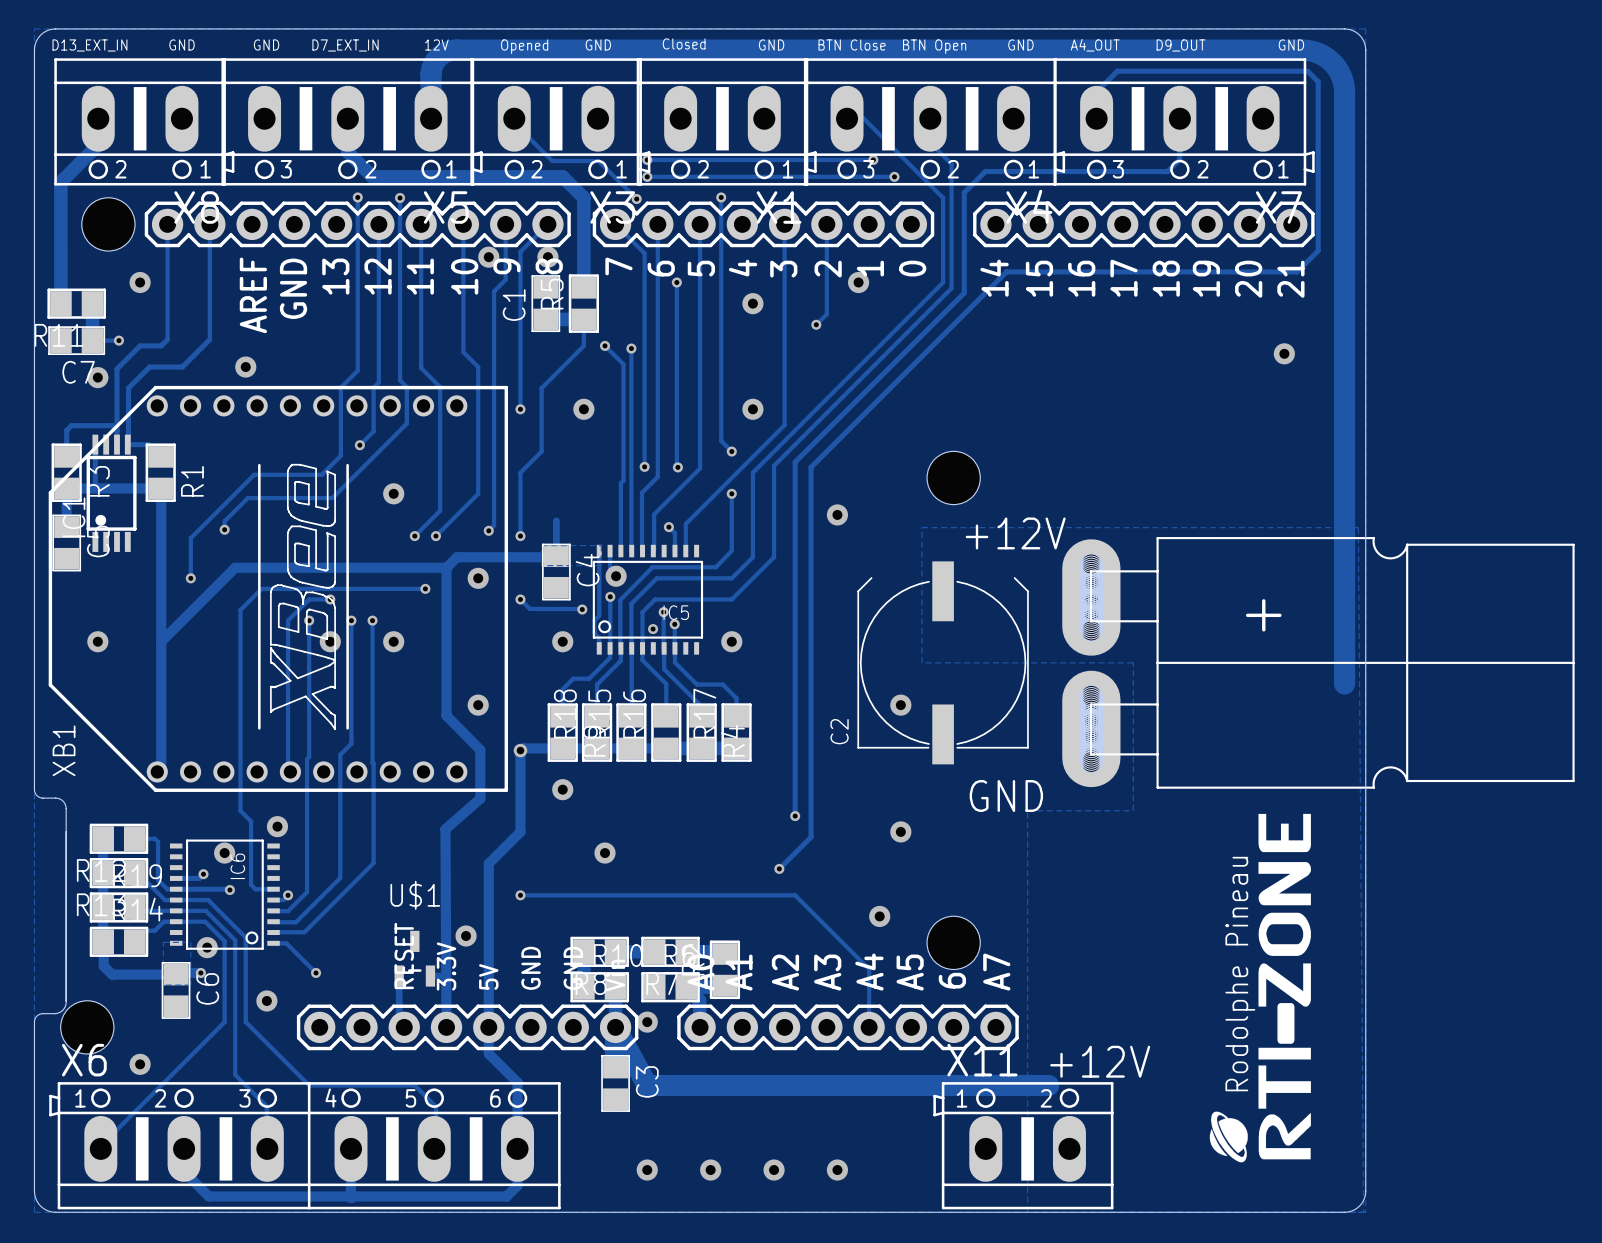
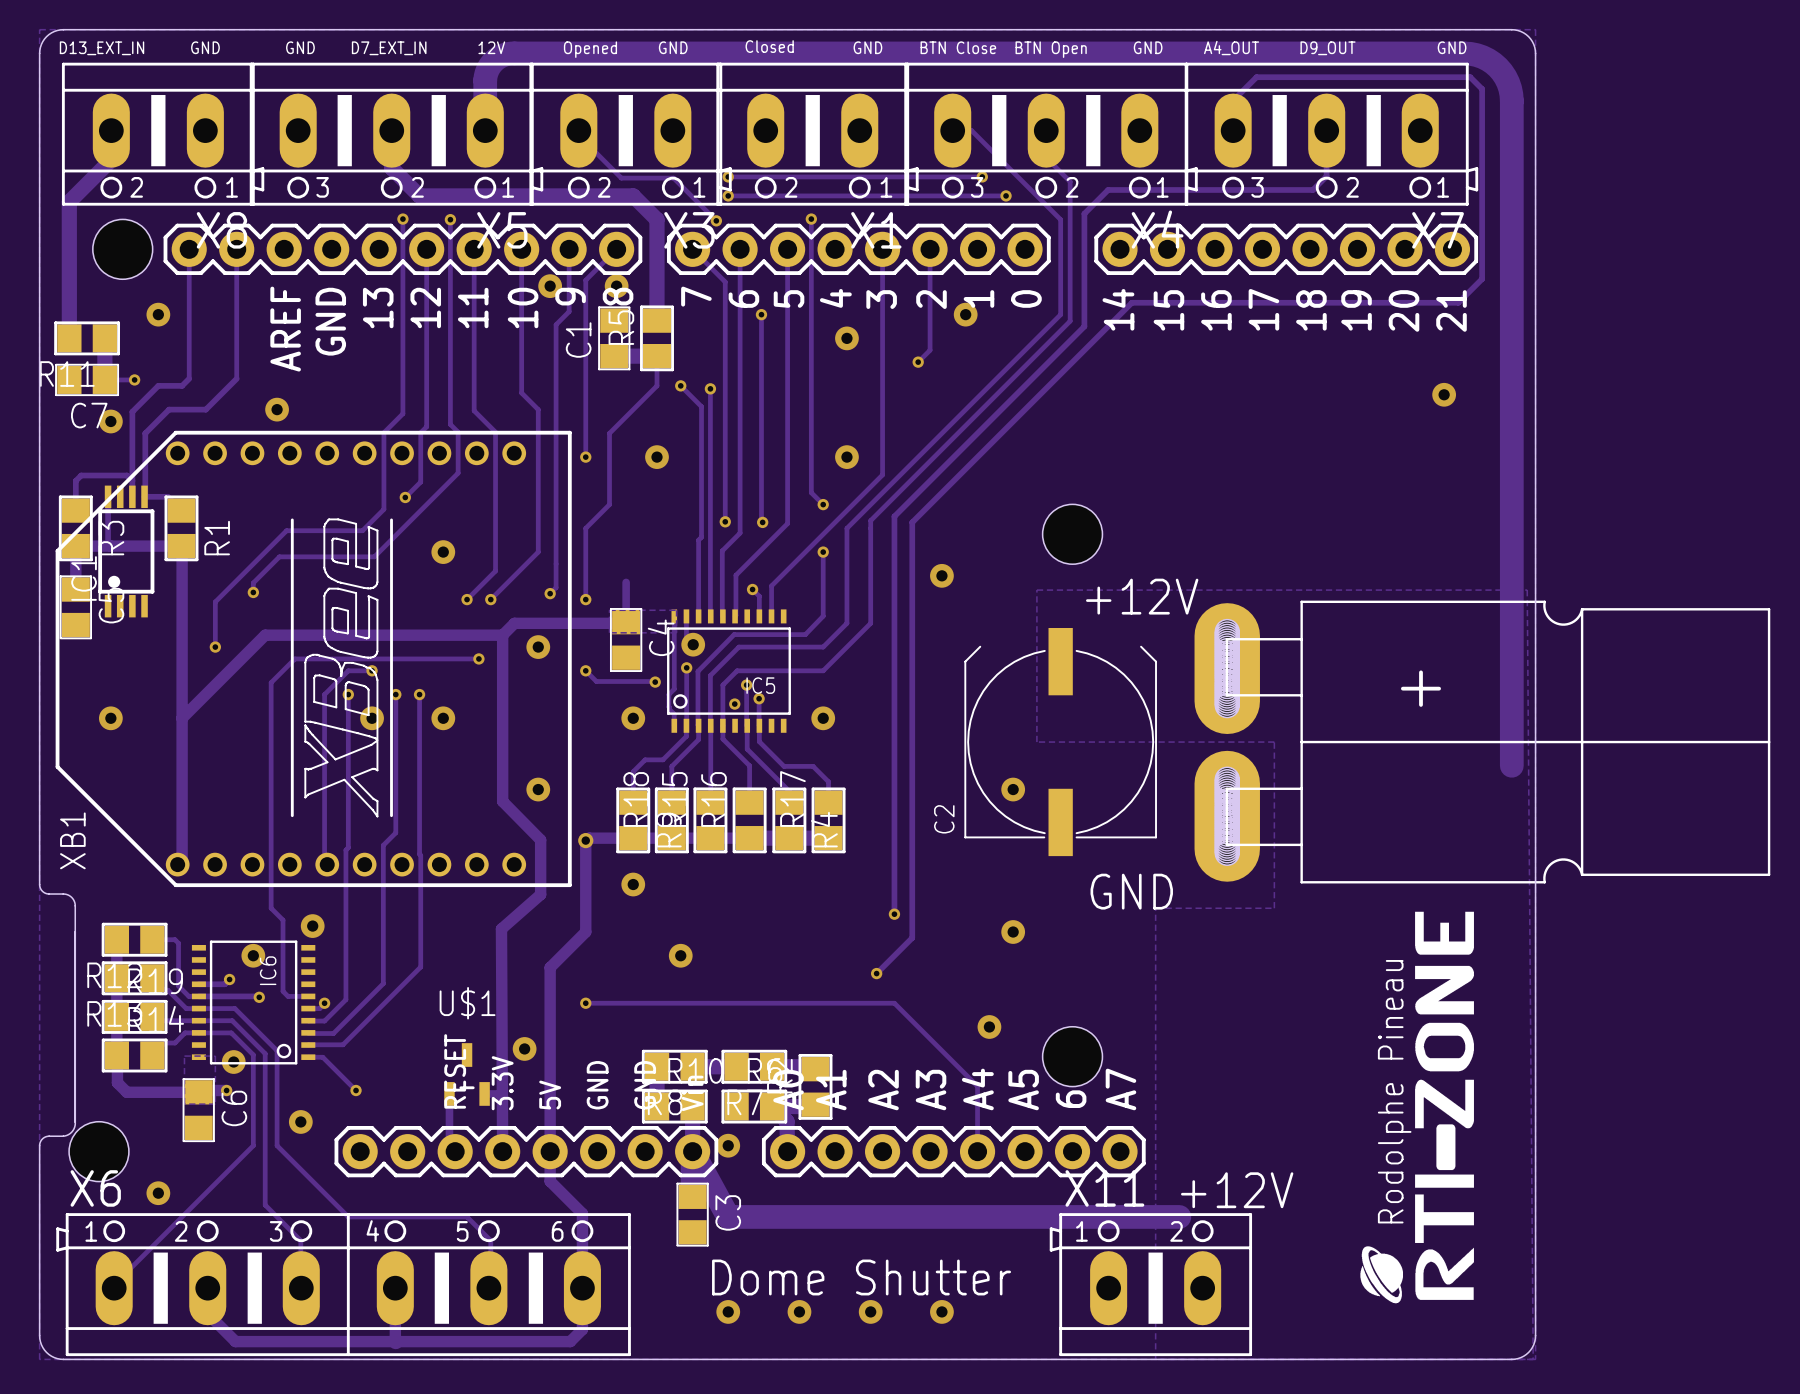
text: none -> Dome Shutter (861, 1277)

